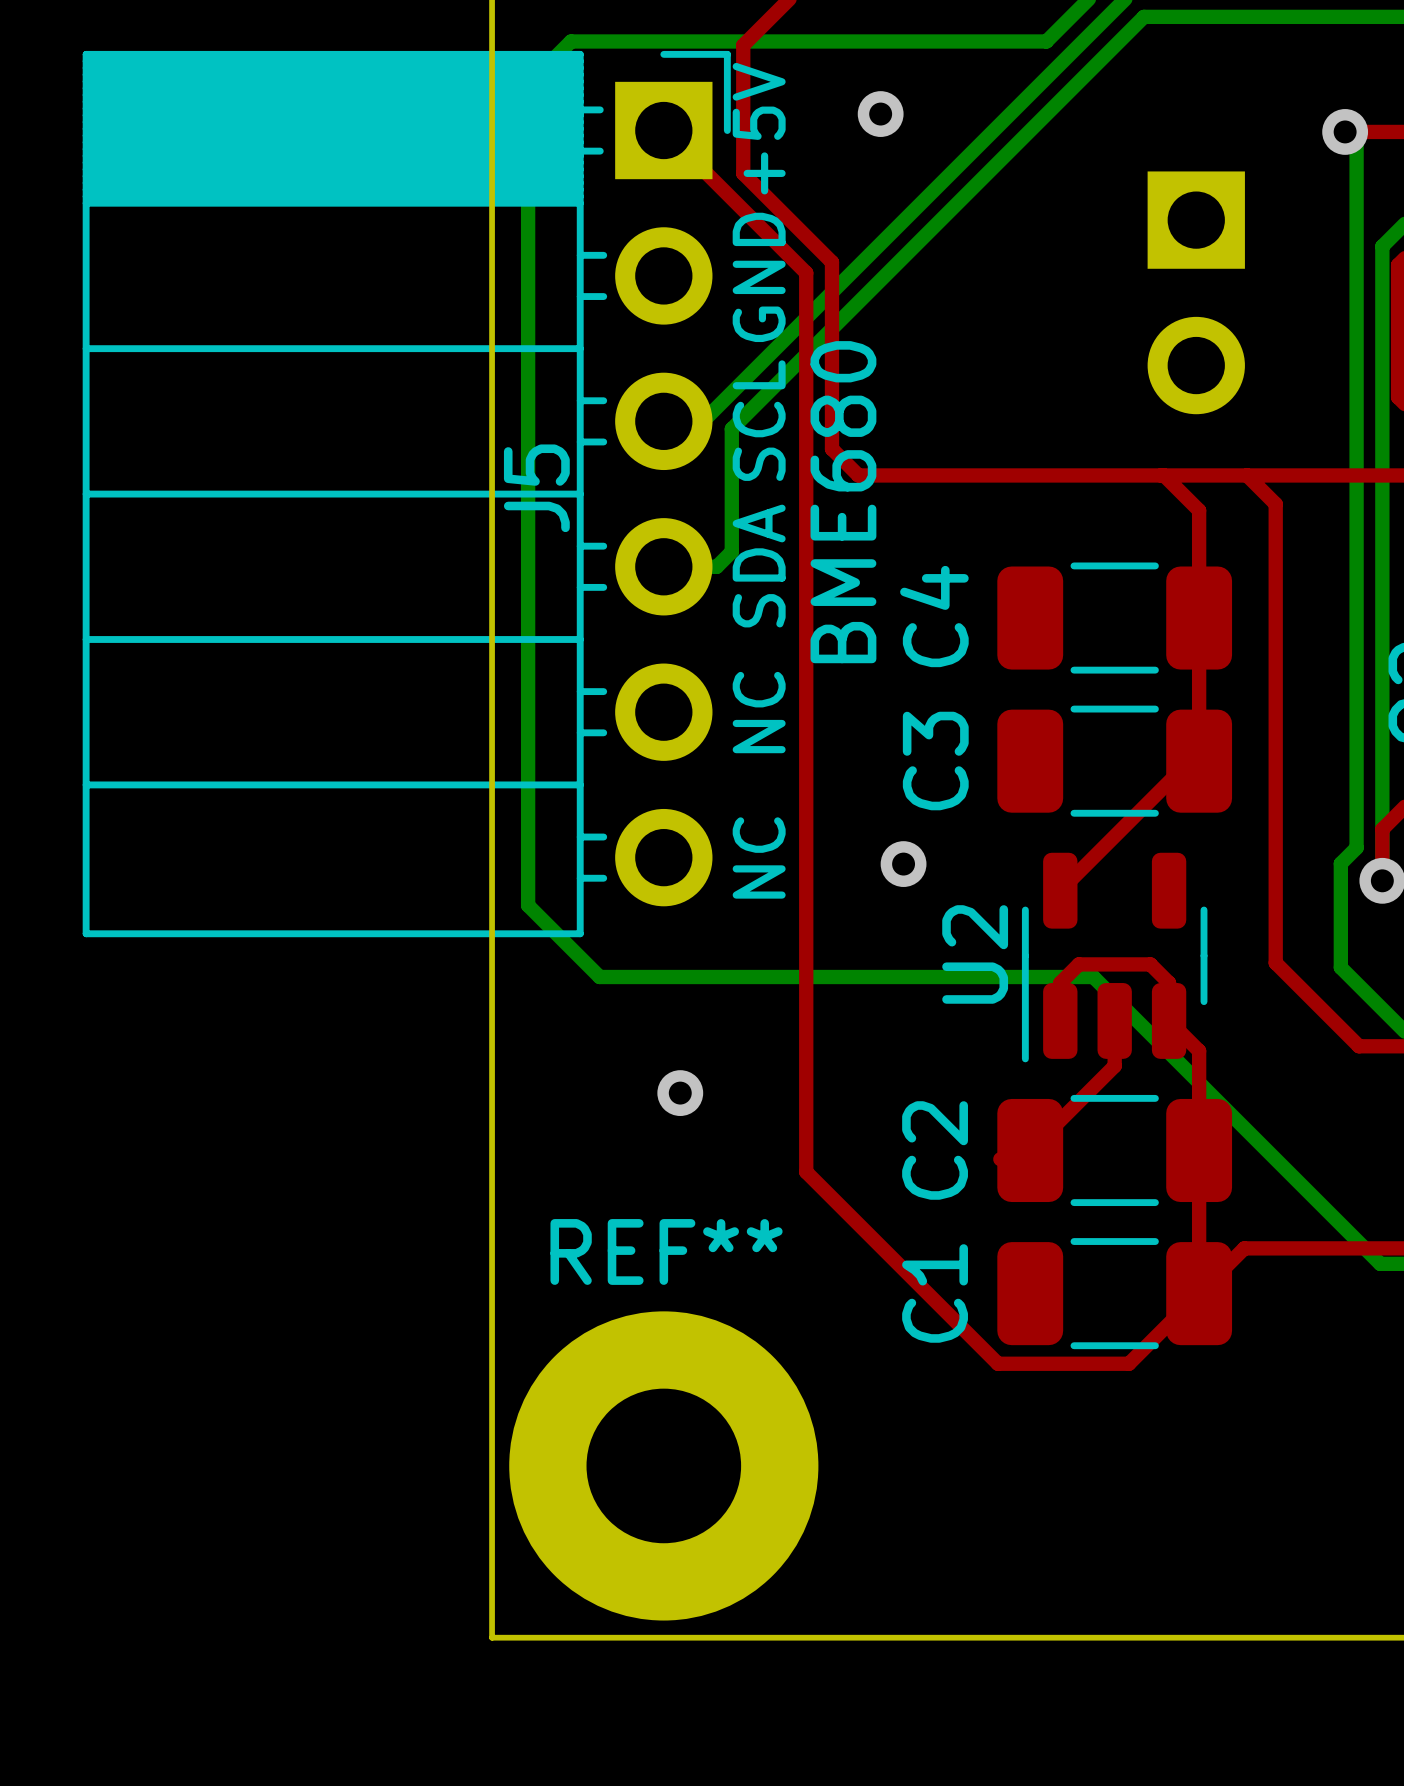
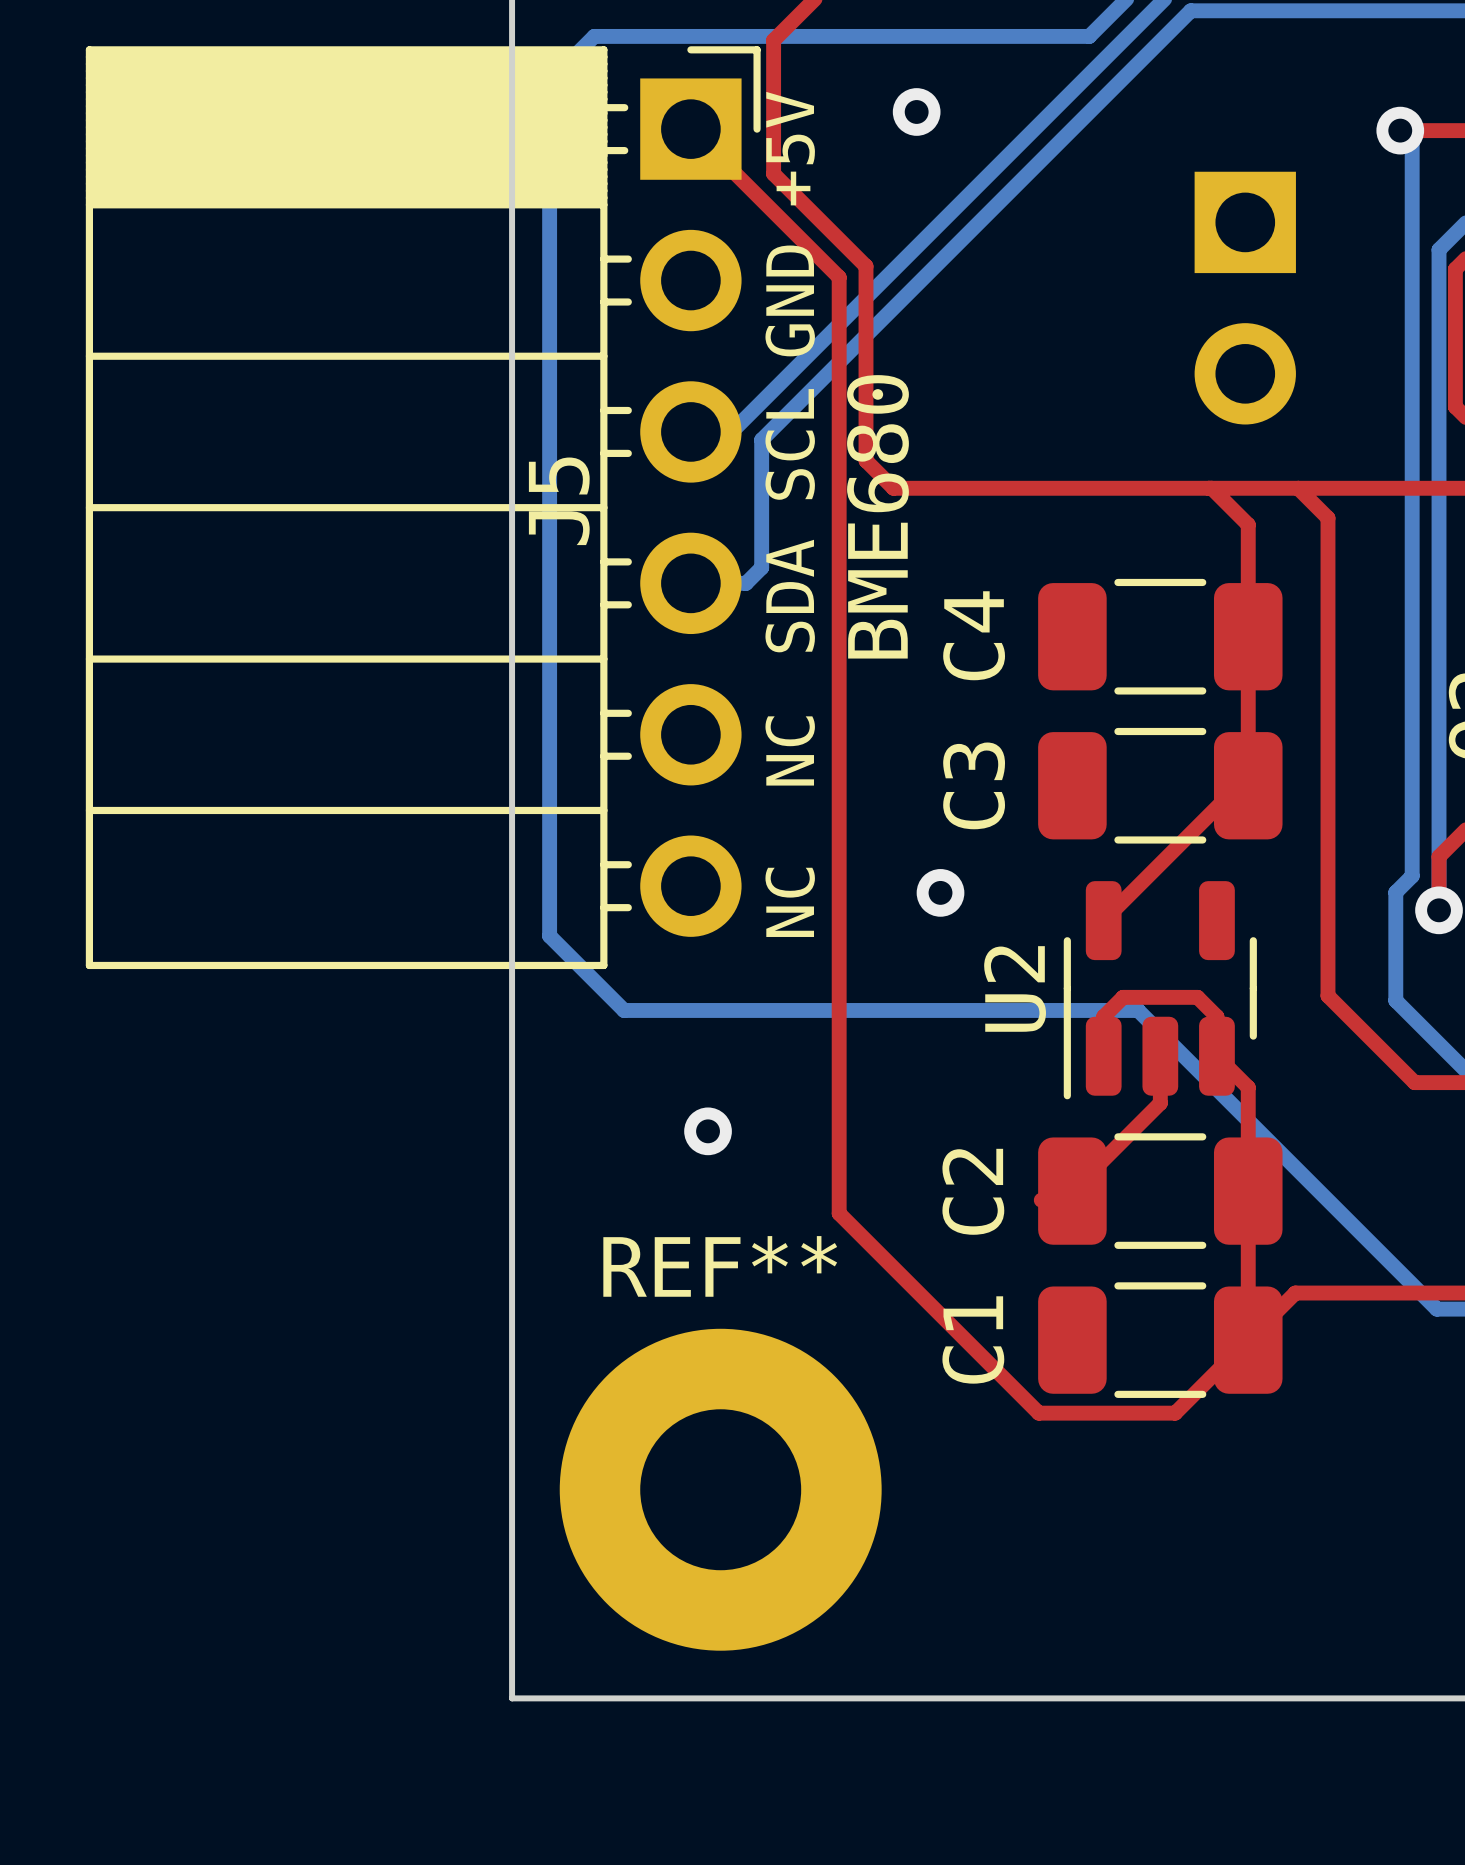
REF** position: (663, 1465) -> (720, 1489)

